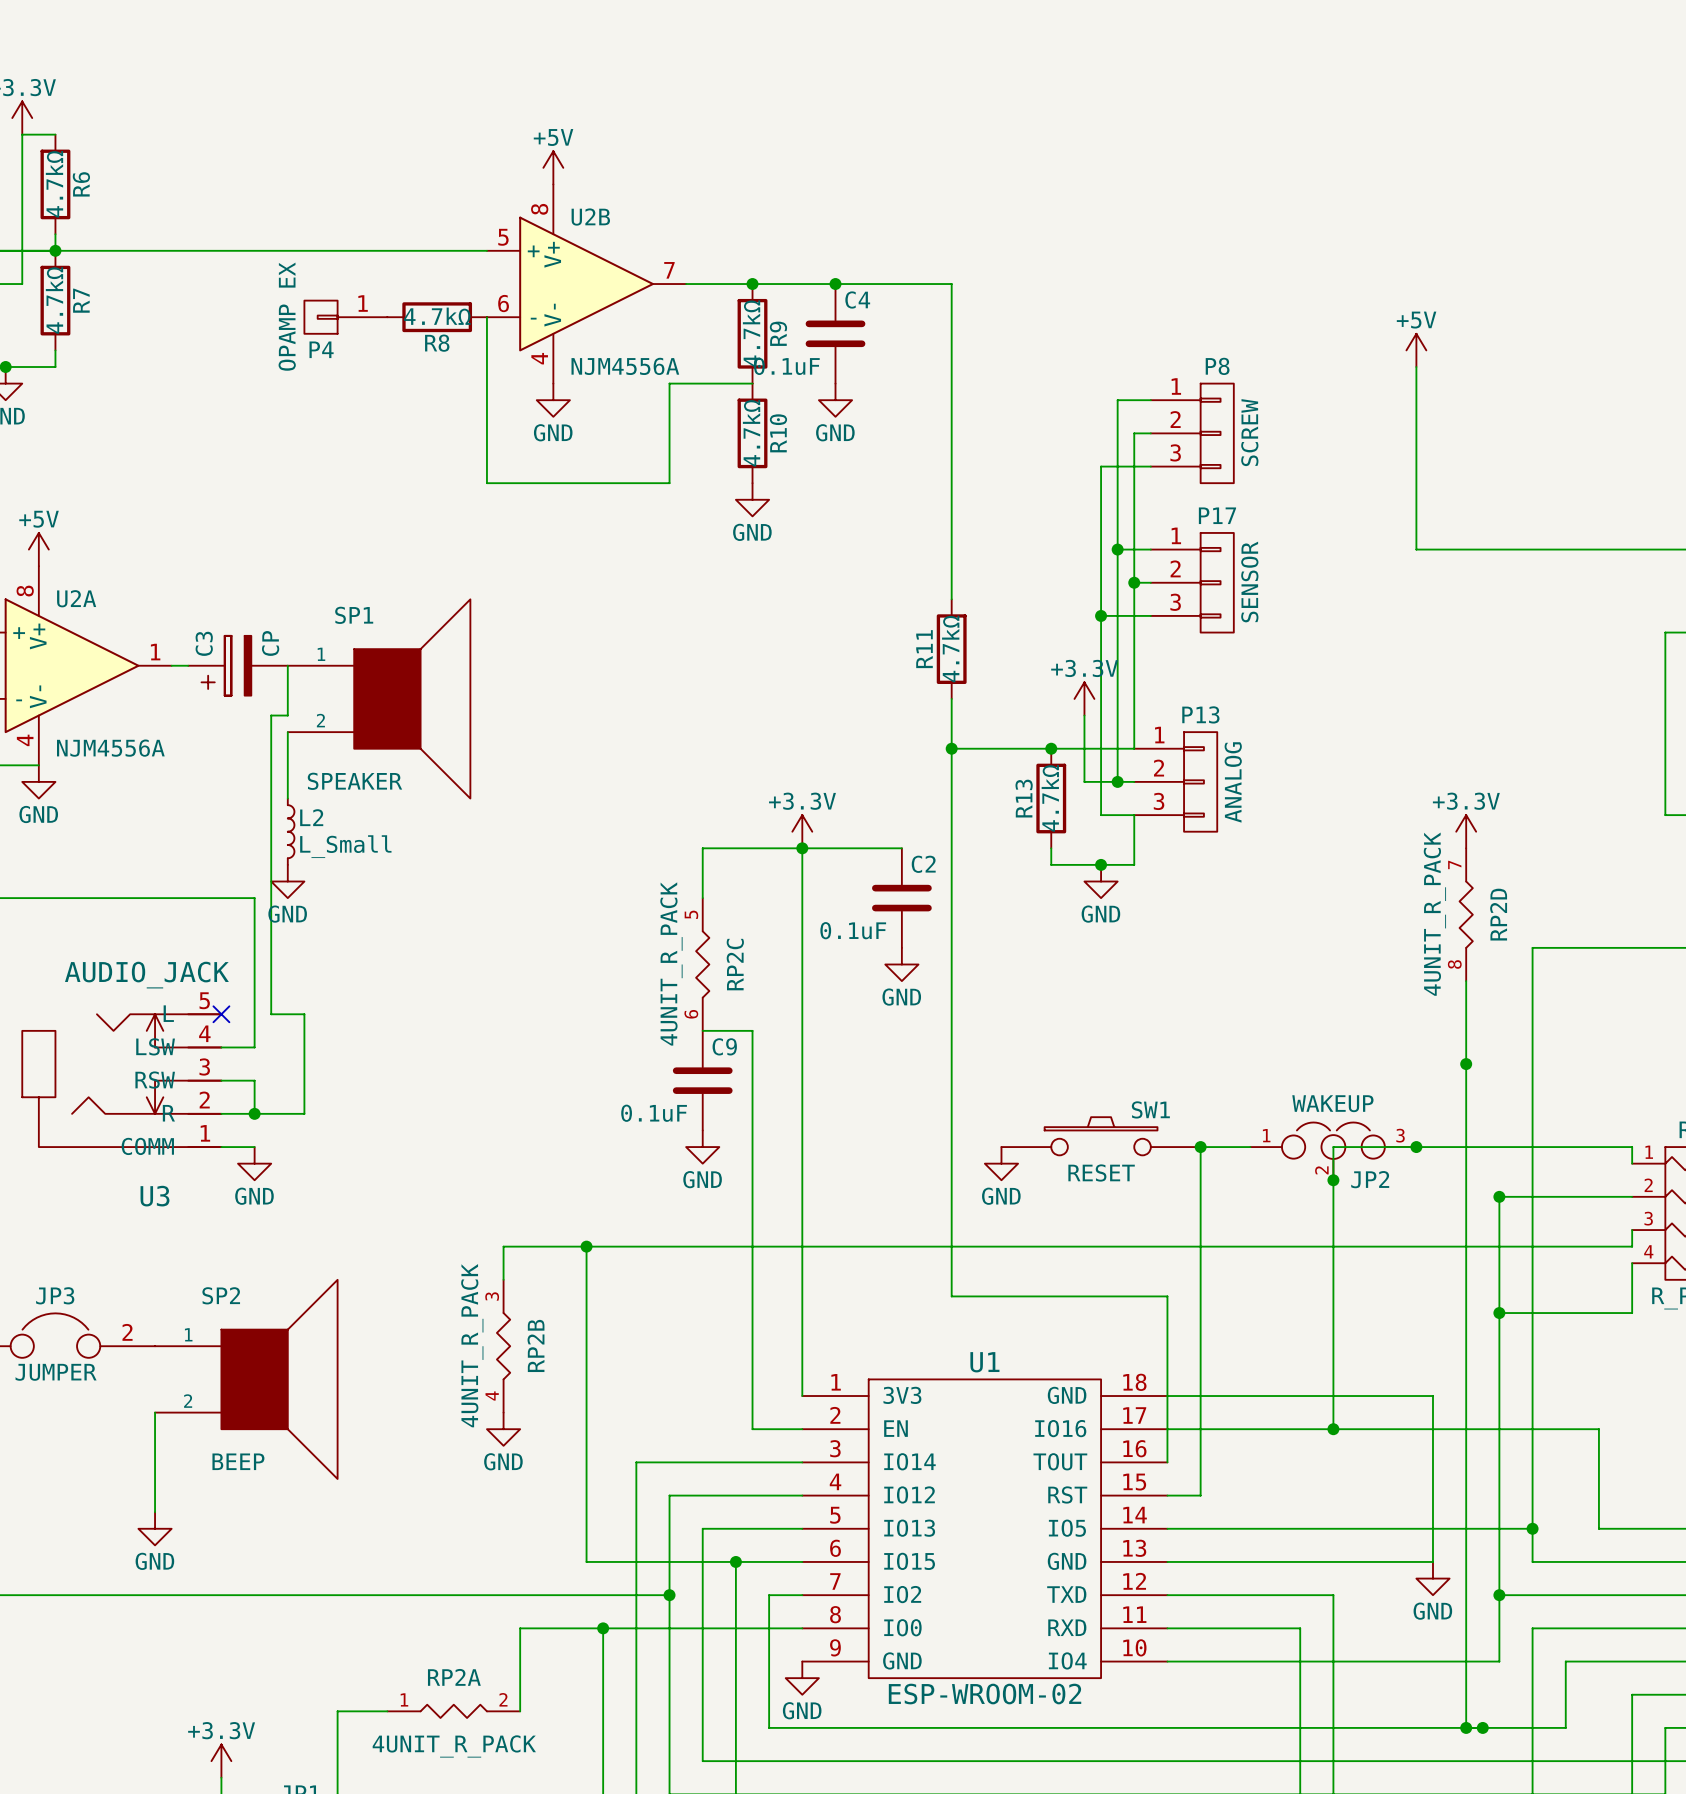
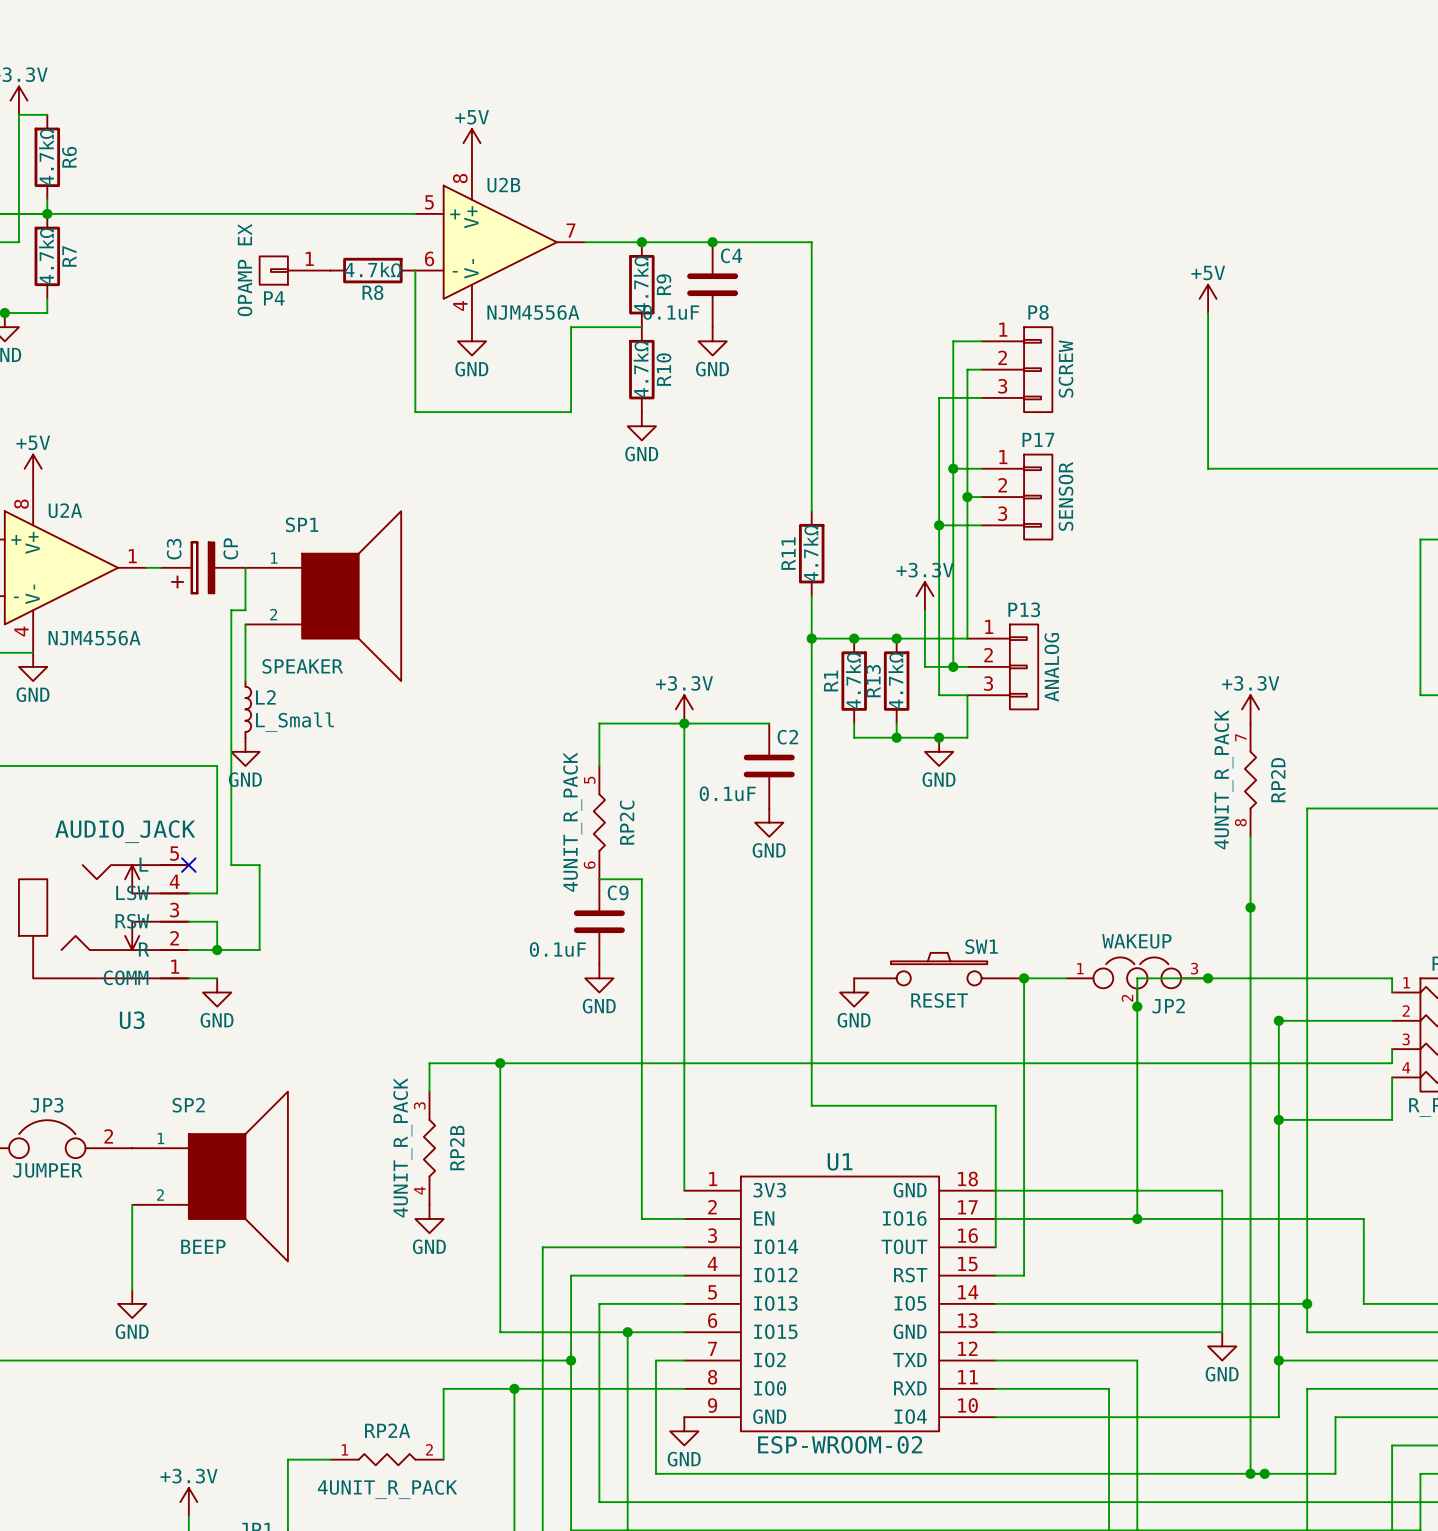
junction: none -> (854, 638)
R1: none -> 4.7kΩ (854, 681)
wire: none -> (854, 723) (854, 737) (896, 737)
junction: none -> (896, 737)

